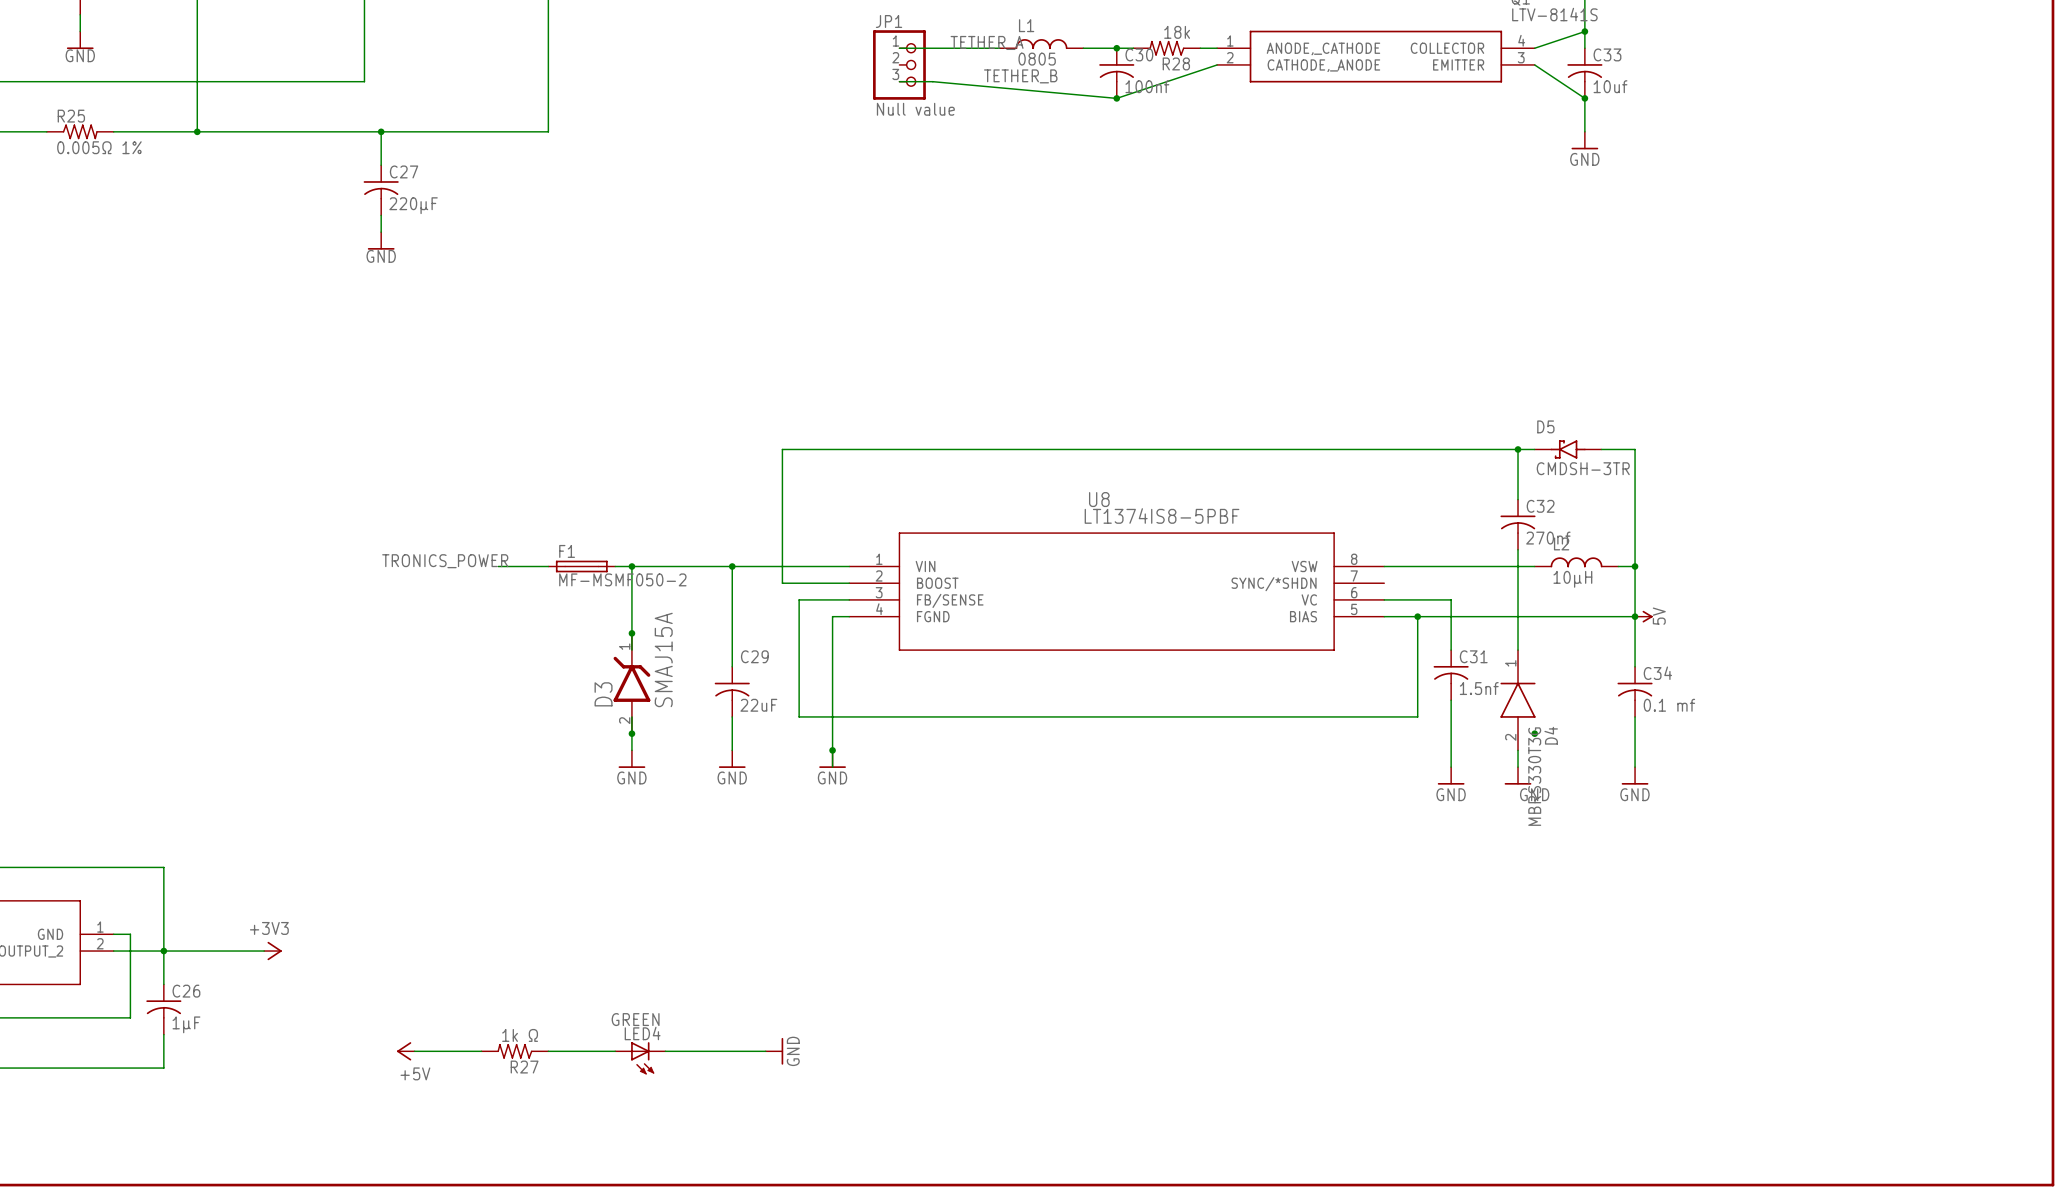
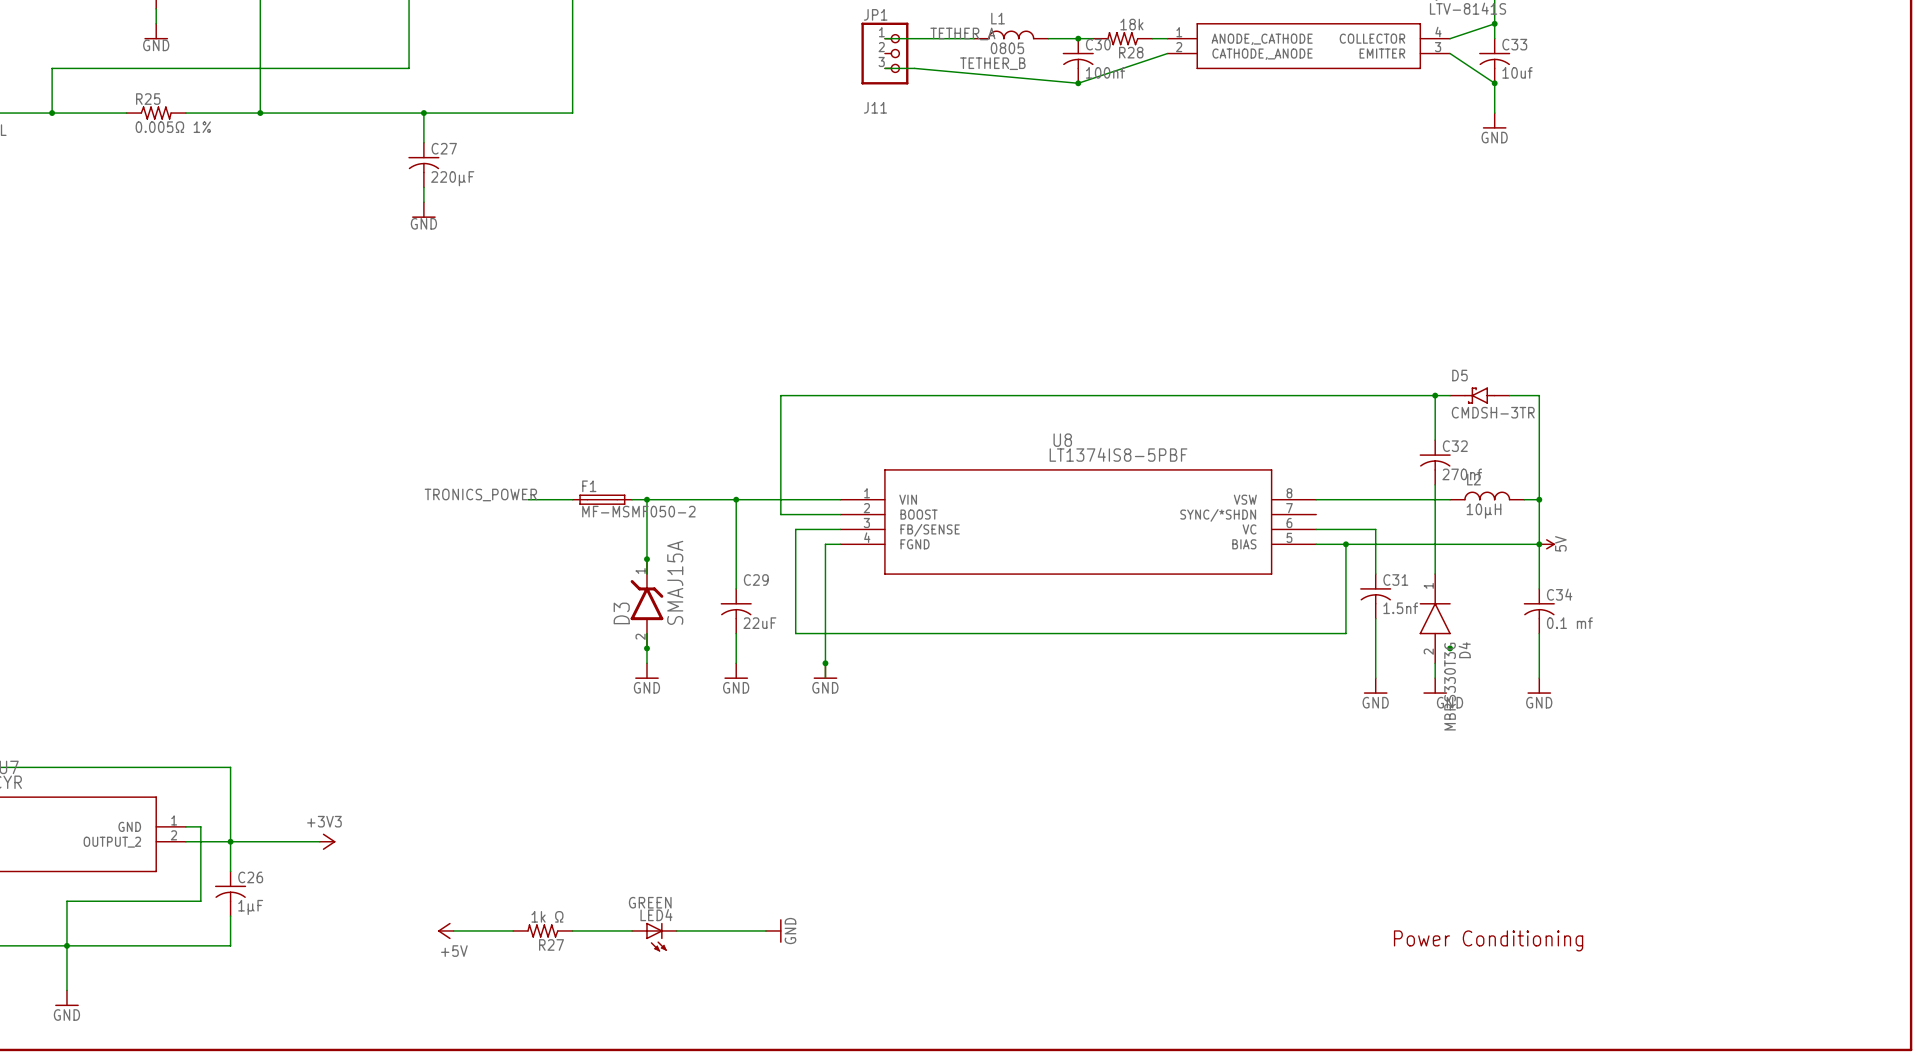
JP1 value: Null value (915, 109) -> J11 (875, 107)
text: none -> Power Conditioning (1488, 940)

